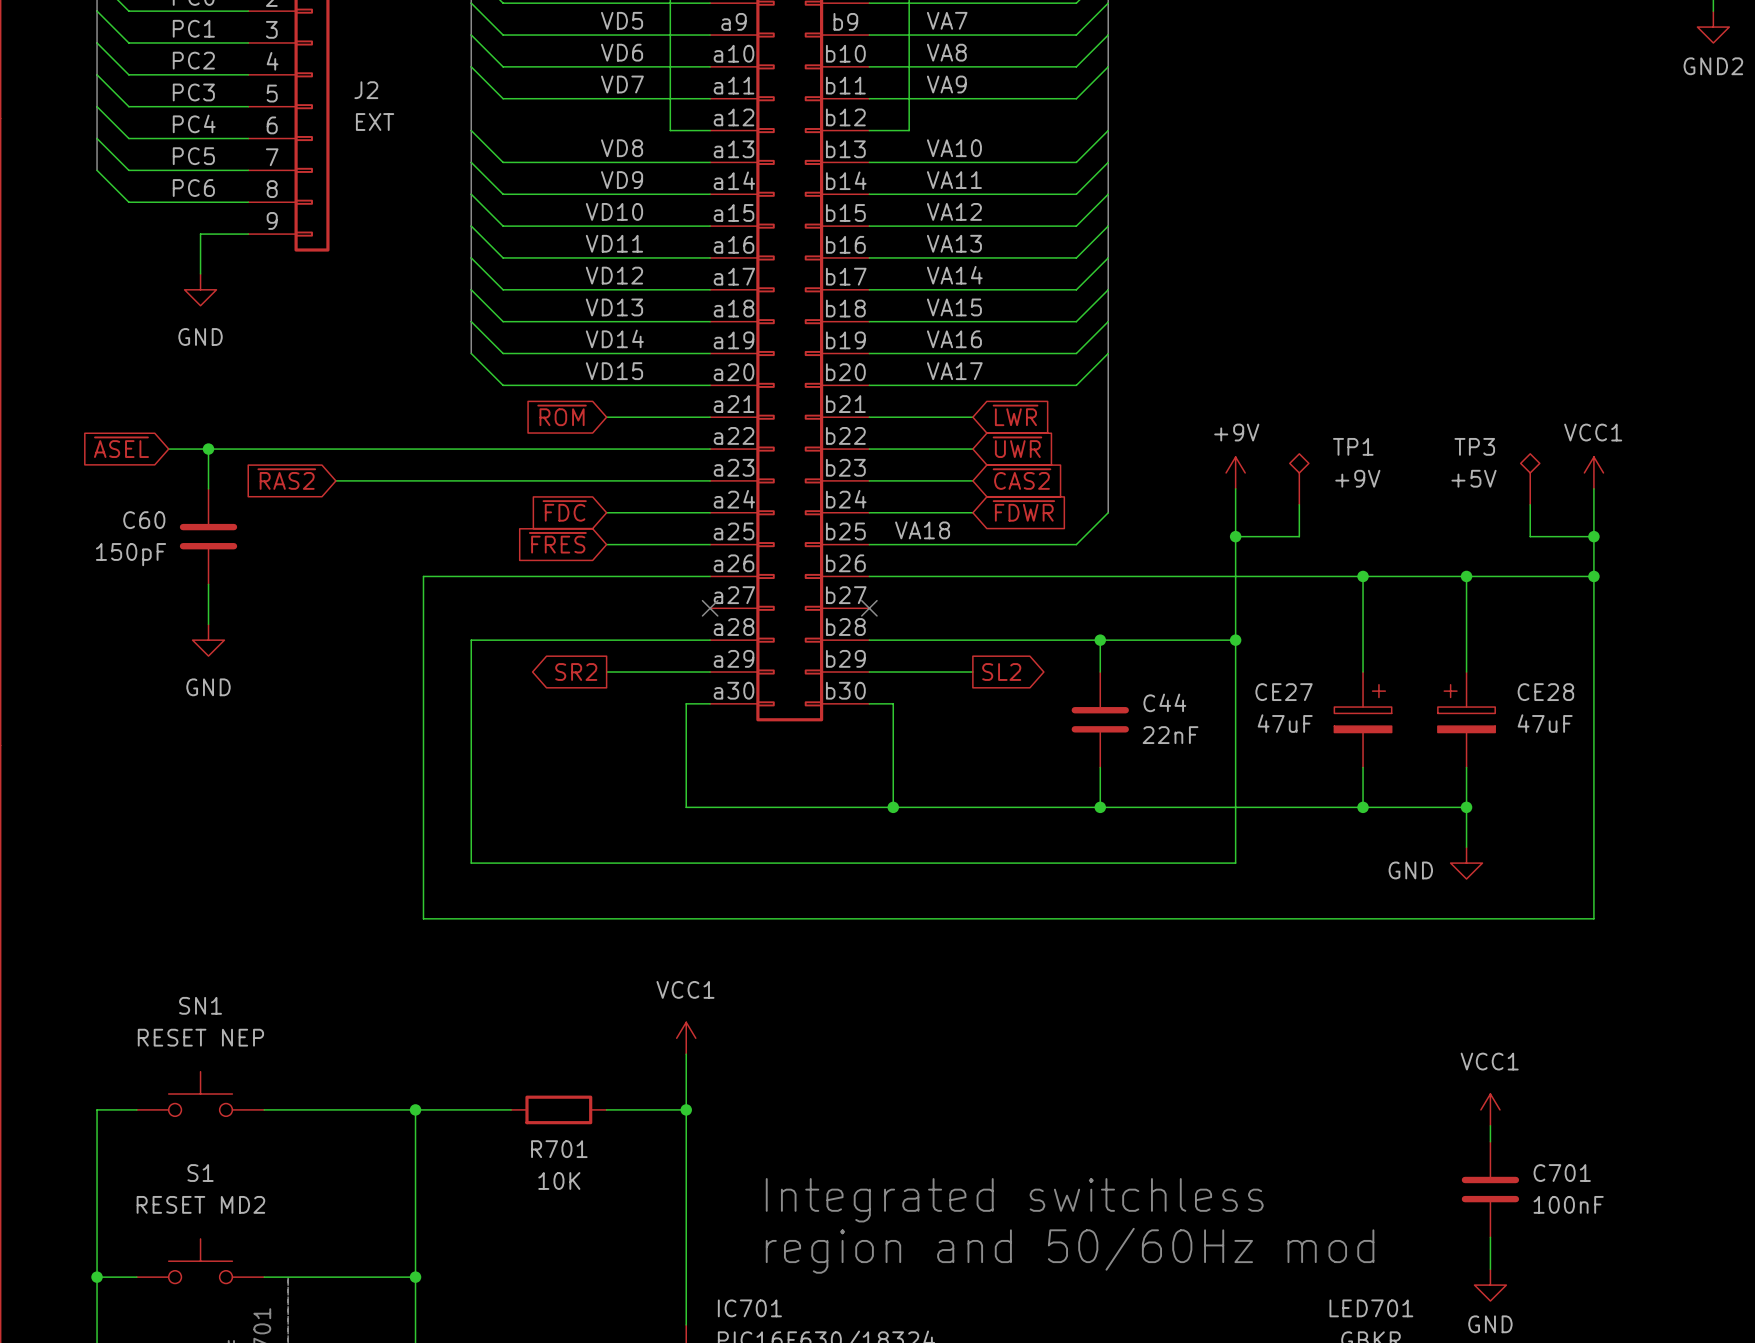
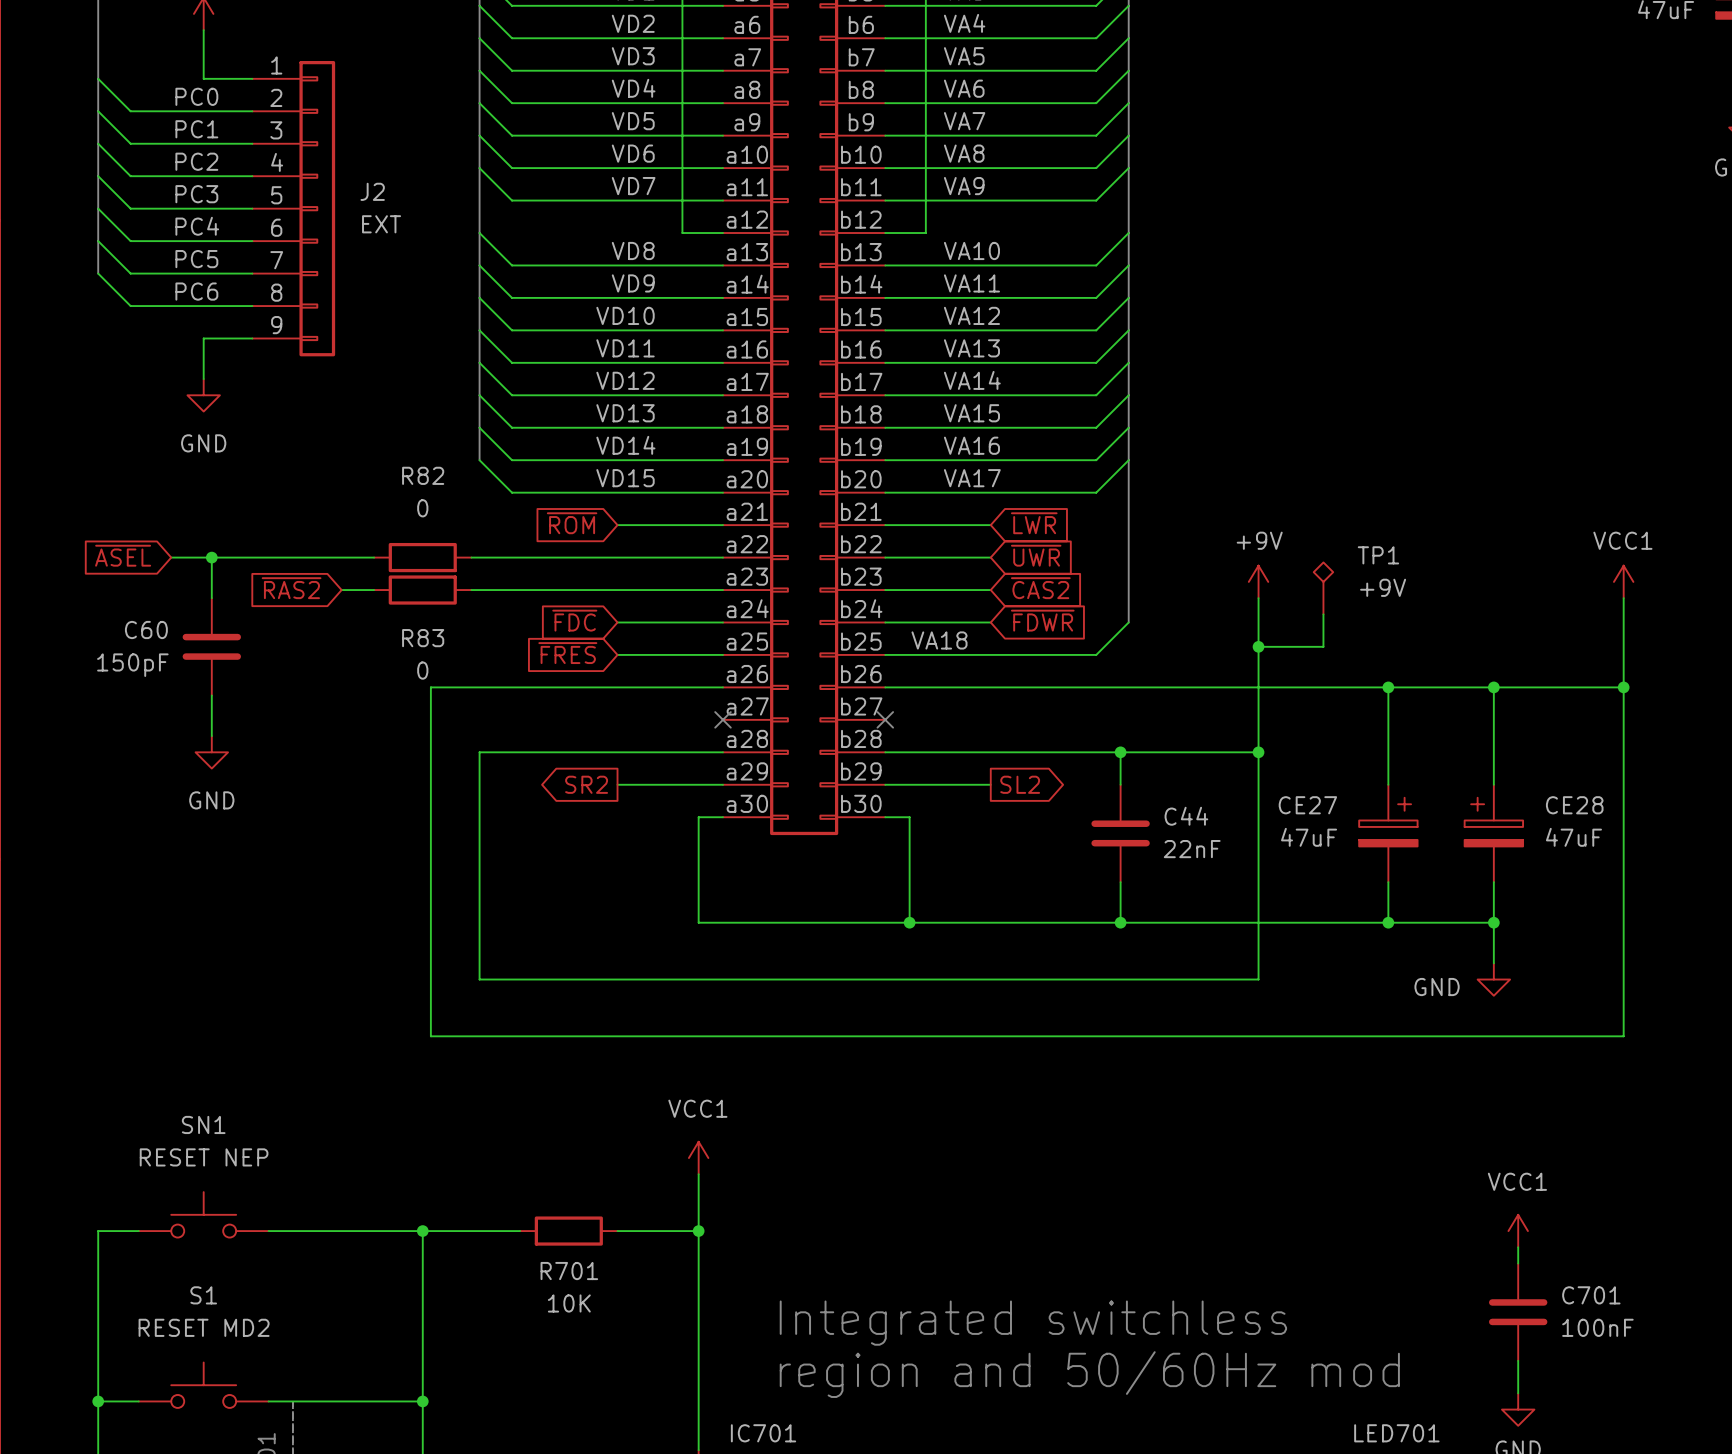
wire: (367, 449) (463, 449) -> none
R82: none -> 0 (422, 557)
TP3: +5V (1530, 479) -> none
wire: (367, 480) (463, 480) -> none
R83: none -> 0 (422, 590)
wire: (1530, 504) (1530, 536) (1593, 536) -> none
junction: (1593, 536) -> none

